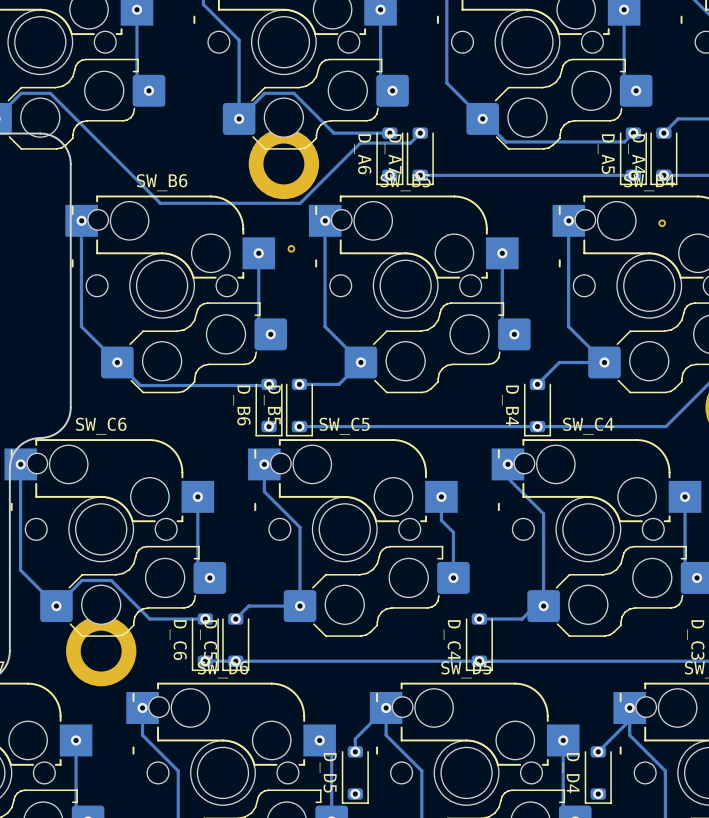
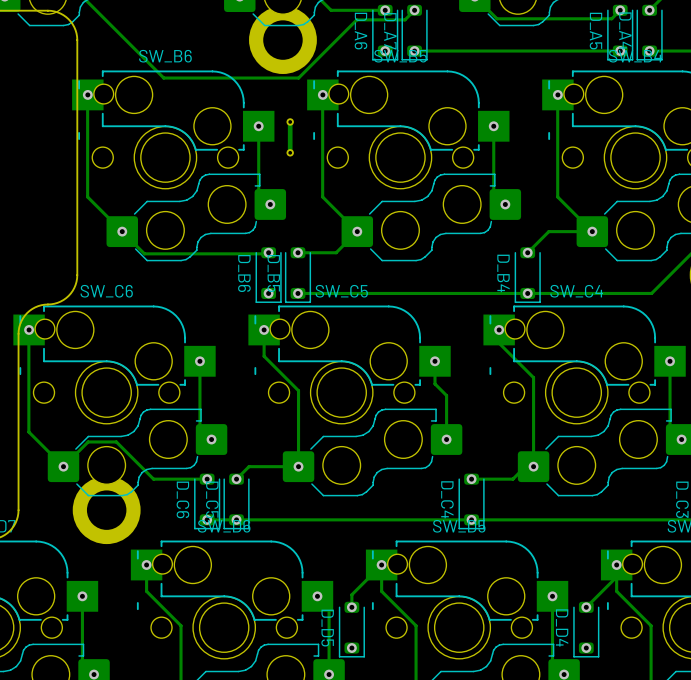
part: (662, 223) -> none
track: none -> (290, 121) (290, 152)
part: none -> (290, 152)

